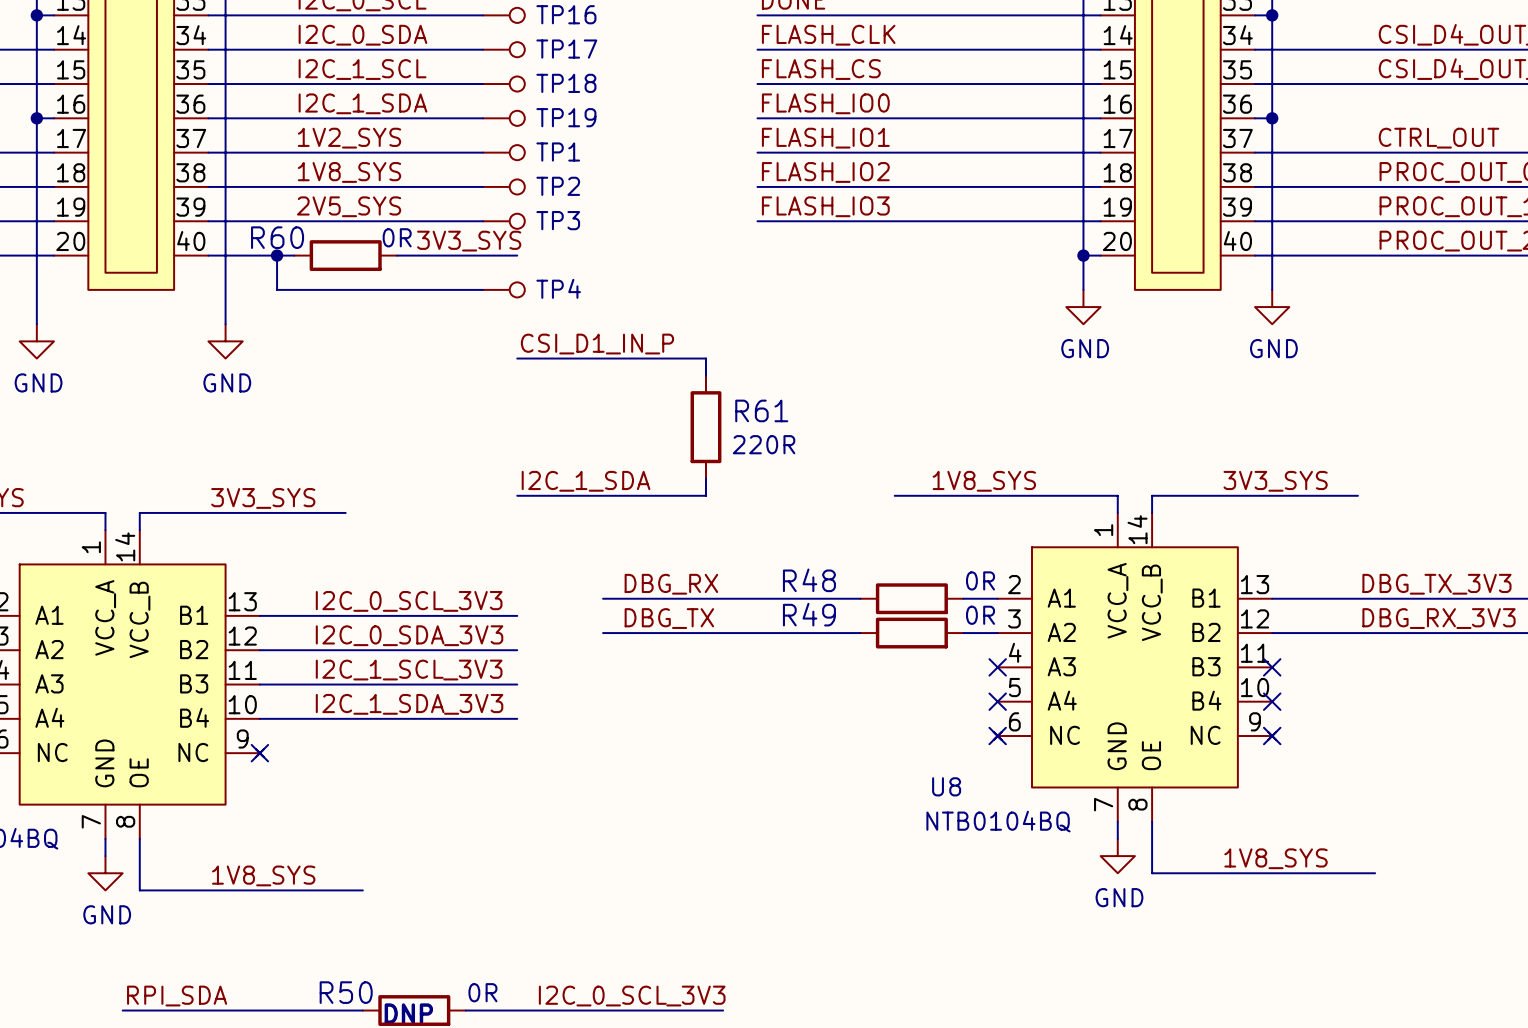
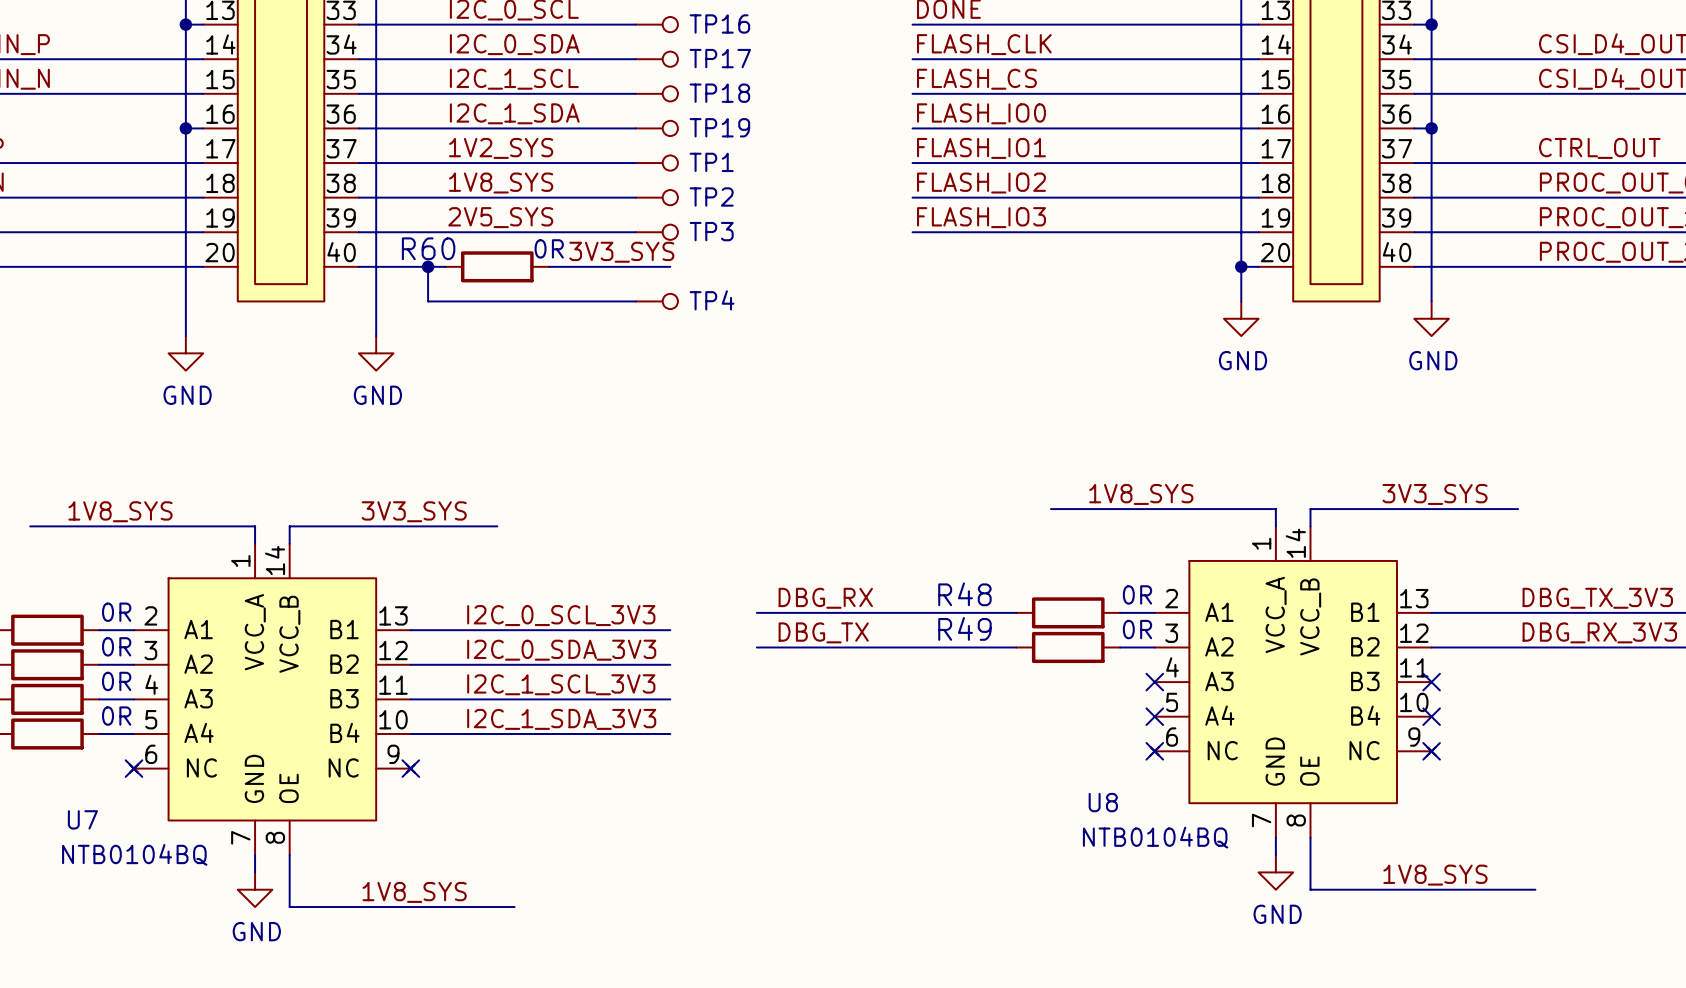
label: CSI_D1_IN_P (597, 344) -> none
wire: (517, 358) (705, 358) (705, 375) -> none
R61: (705, 427) -> none
wire: (705, 478) (705, 495) (517, 495) -> none
label: I2C_1_SDA (586, 481) -> none

